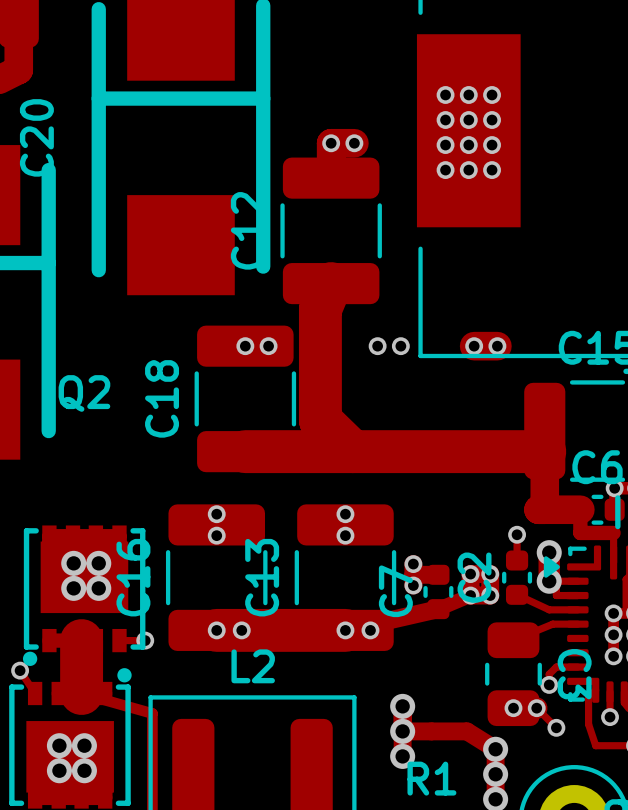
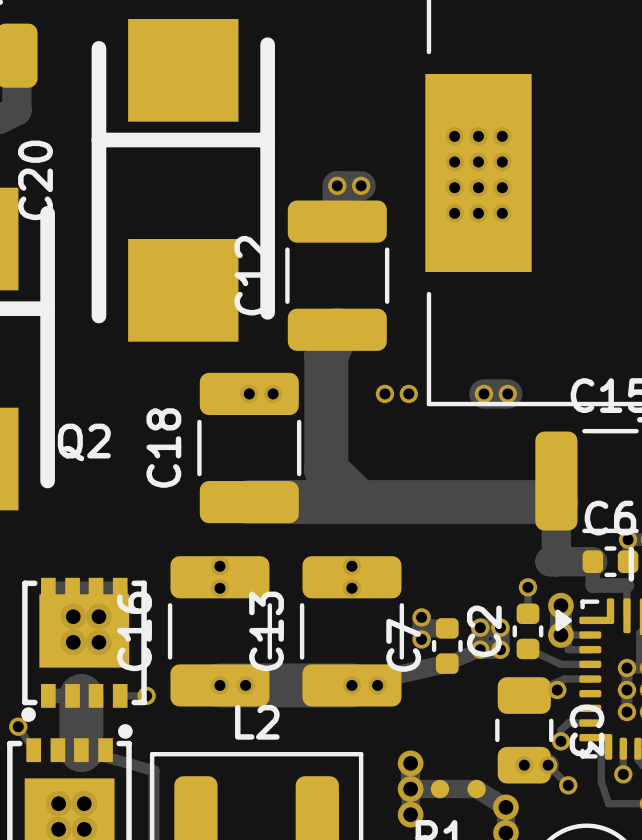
via: none -> (557, 690)

